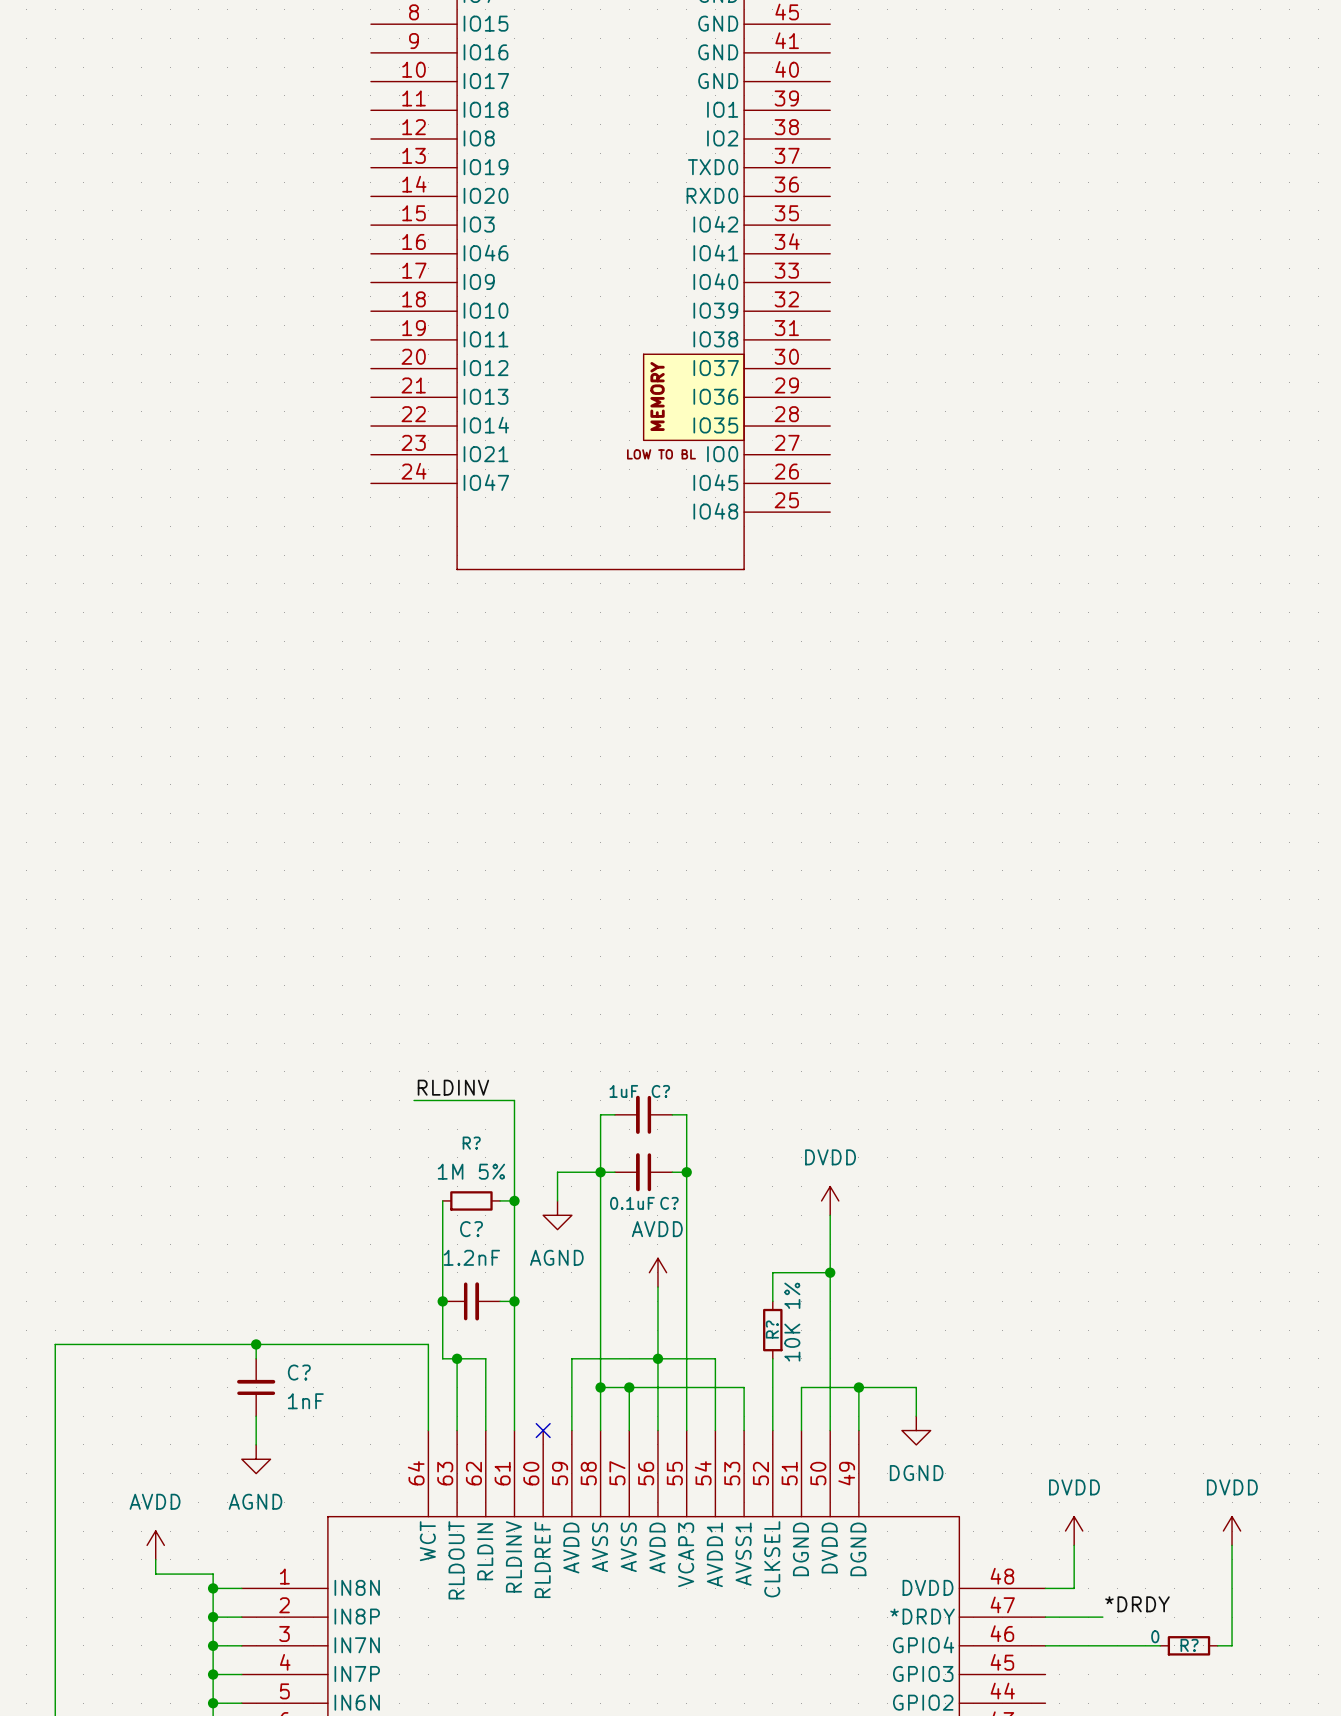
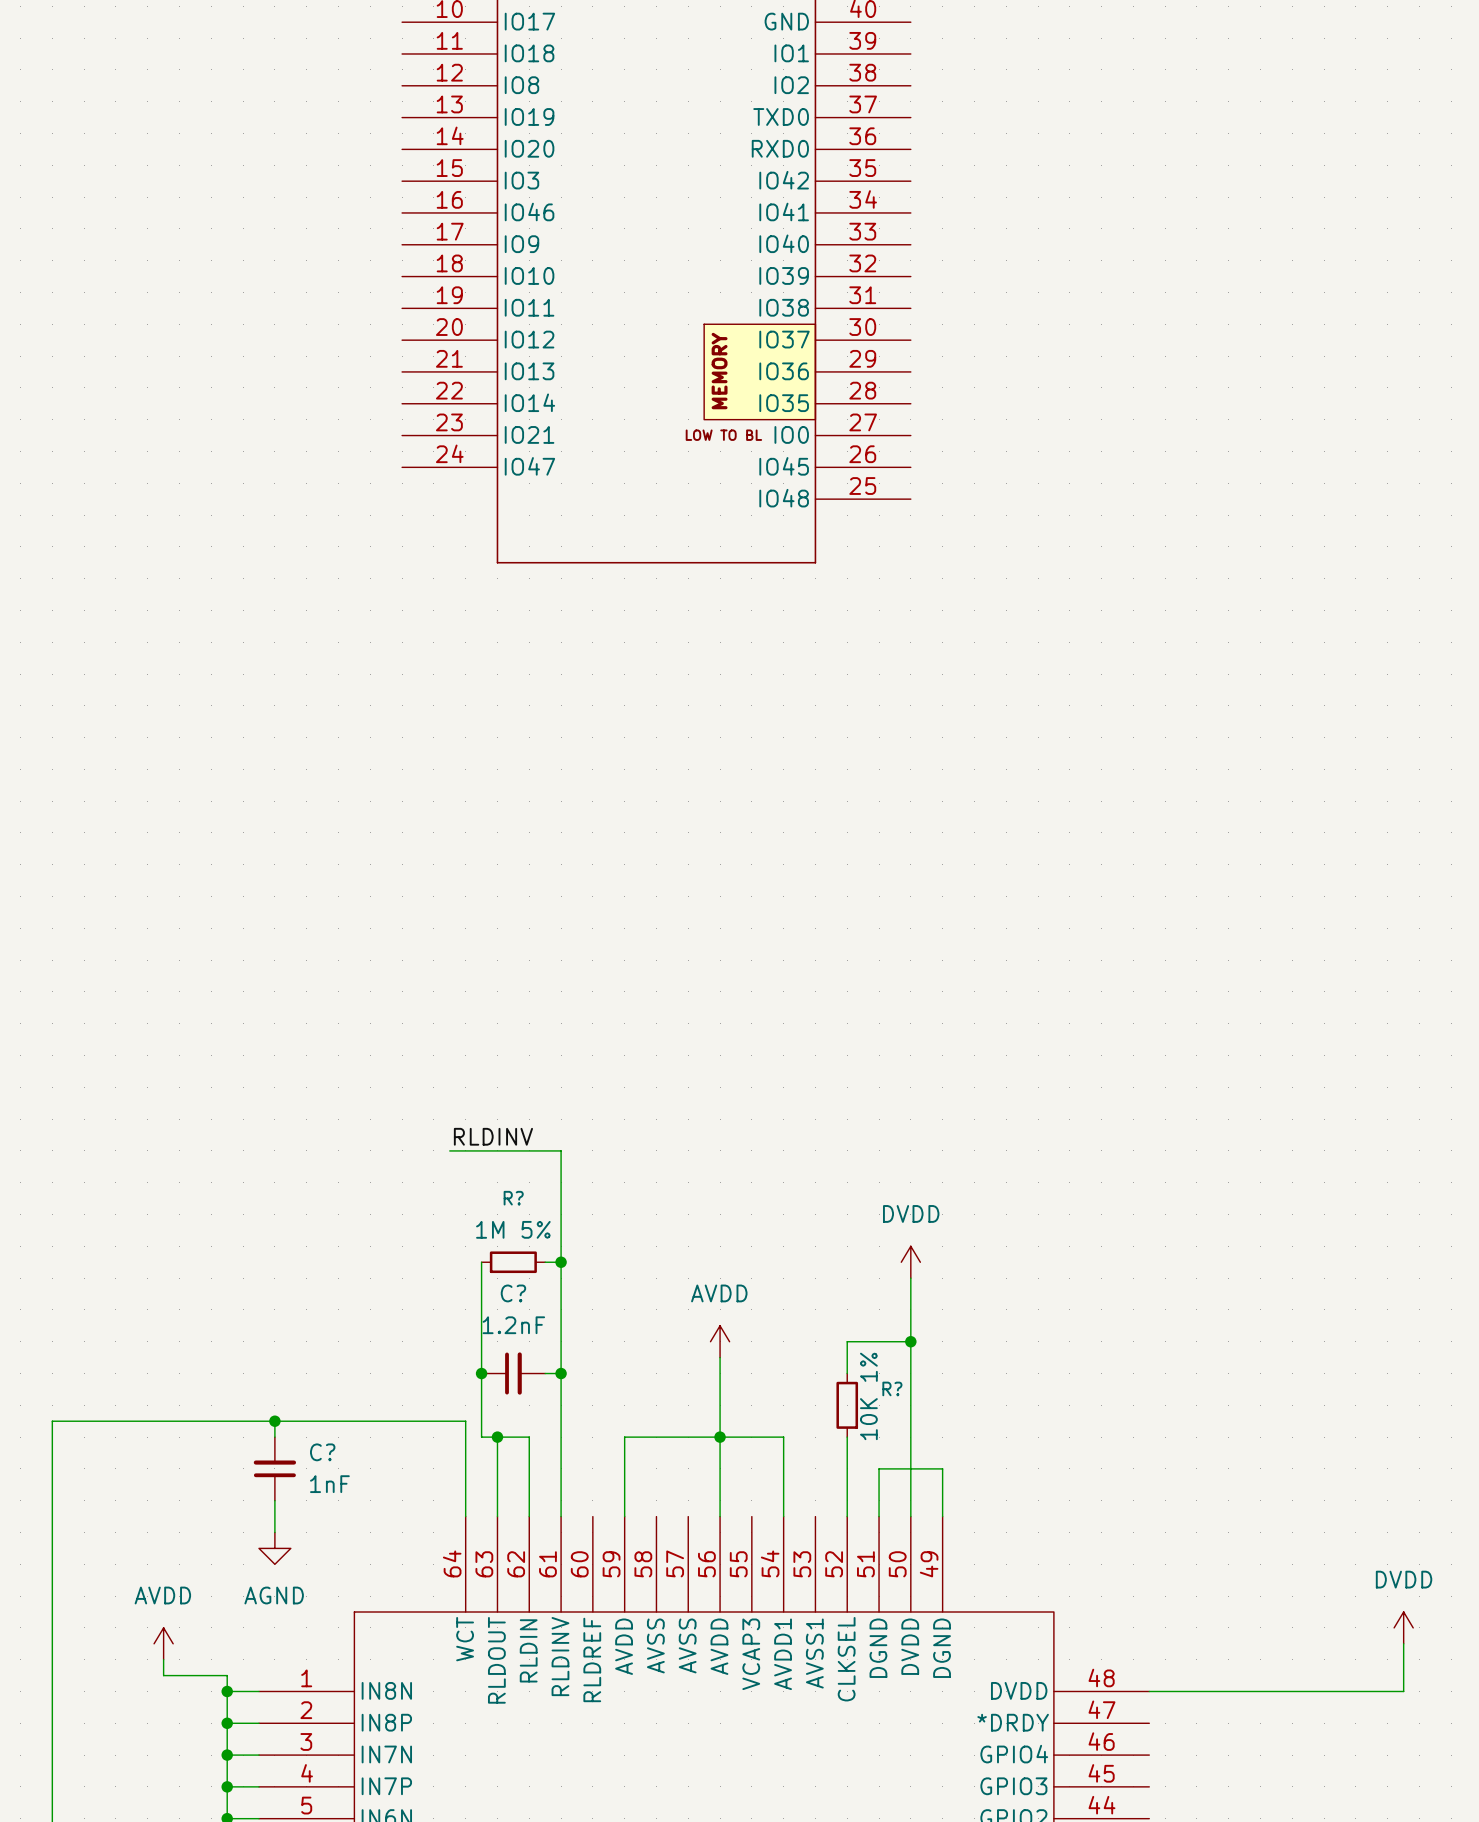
wire: (614, 1114) (600, 1114) (600, 1430) -> none
C?: 1uF (643, 1114) -> none
wire: (672, 1114) (686, 1114) (686, 1430) -> none
junction: (600, 1172) -> none
wire: (614, 1172) (557, 1172) (557, 1200) -> none
C?: 0.1uF (643, 1172) -> none
wire: (672, 1172) (686, 1172) -> none
junction: (686, 1172) -> none
power symbol: AGND (557, 1215) -> none
R? name rotation: 0° (772, 1329) -> 90° clockwise (892, 1388)
R? name position: R? (772, 1329) -> R? (892, 1388)
wire: (600, 1387) (744, 1387) (744, 1430) -> none
junction: (600, 1387) -> none
wire: (629, 1387) (629, 1430) -> none
junction: (629, 1387) -> none
wire: (858, 1387) (916, 1387) (916, 1416) -> none
junction: (858, 1387) -> none
no-connect mark: (543, 1430) -> none
power symbol: DGND (916, 1430) -> none
power symbol: DVDD (1074, 1531) -> none
power symbol position: DVDD (1232, 1531) -> DVDD (1403, 1627)
wire: (1074, 1545) (1074, 1588) -> (1403, 1643) (1403, 1691) (1181, 1691)
wire: (1232, 1545) (1232, 1645) (1217, 1645) -> none
label: *DRDY (1137, 1604) -> none
wire: (1045, 1617) (1102, 1617) -> none
wire: (1045, 1645) (1160, 1645) -> none
R?: 0 (1188, 1645) -> none

